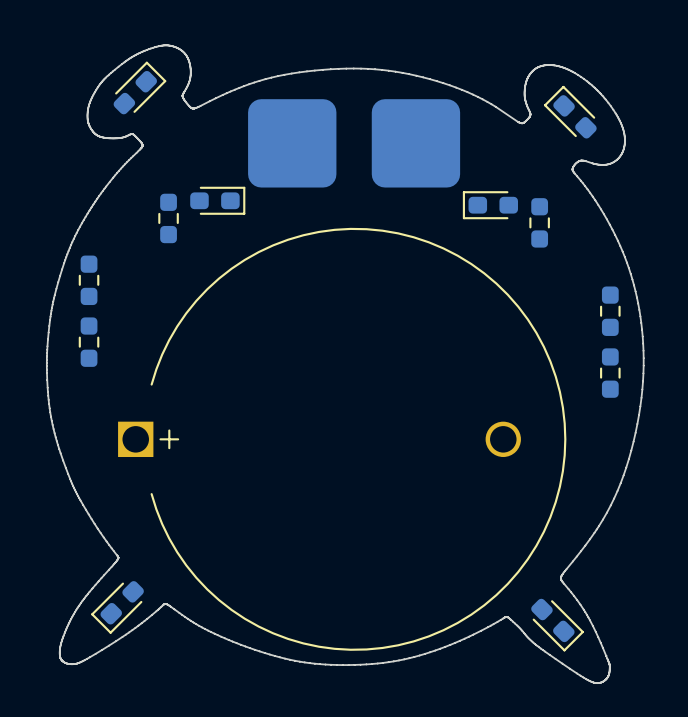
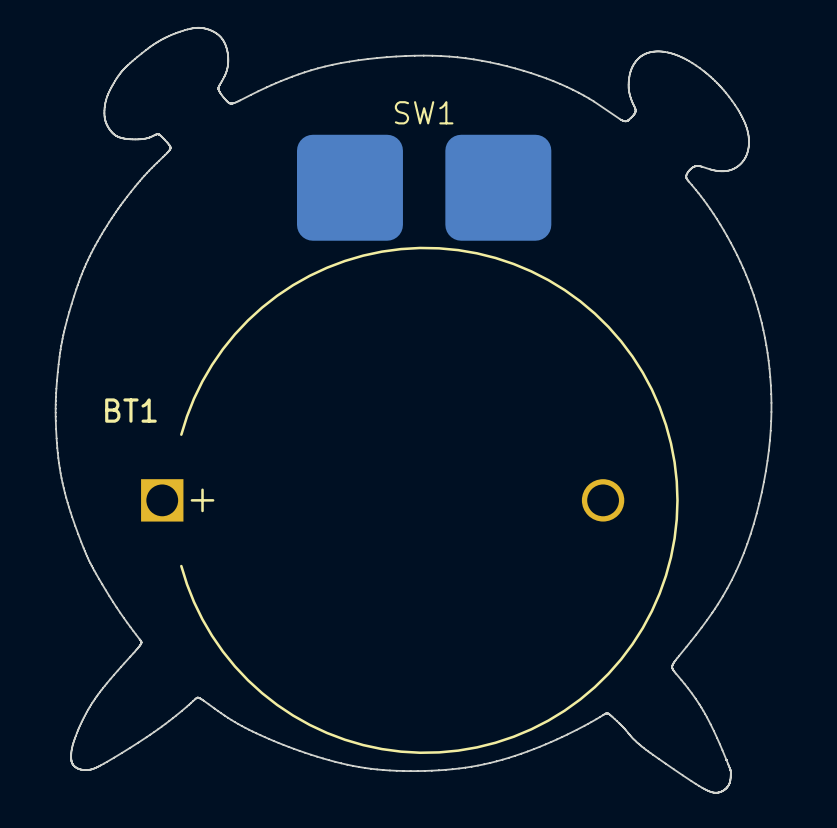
part: (139, 88) -> none
part: (570, 112) -> none
part: (354, 143) -> none
SW1: none -> (424, 187)
part: (217, 200) -> none
part: (490, 205) -> none
part: (168, 218) -> none
part: (539, 222) -> none
part: (89, 280) -> none
part: (610, 311) -> none
part: (89, 342) -> none
BT1 name: none -> BT1 (130, 410)
part: (610, 373) -> none
part: (117, 607) -> none
part: (557, 625) -> none

